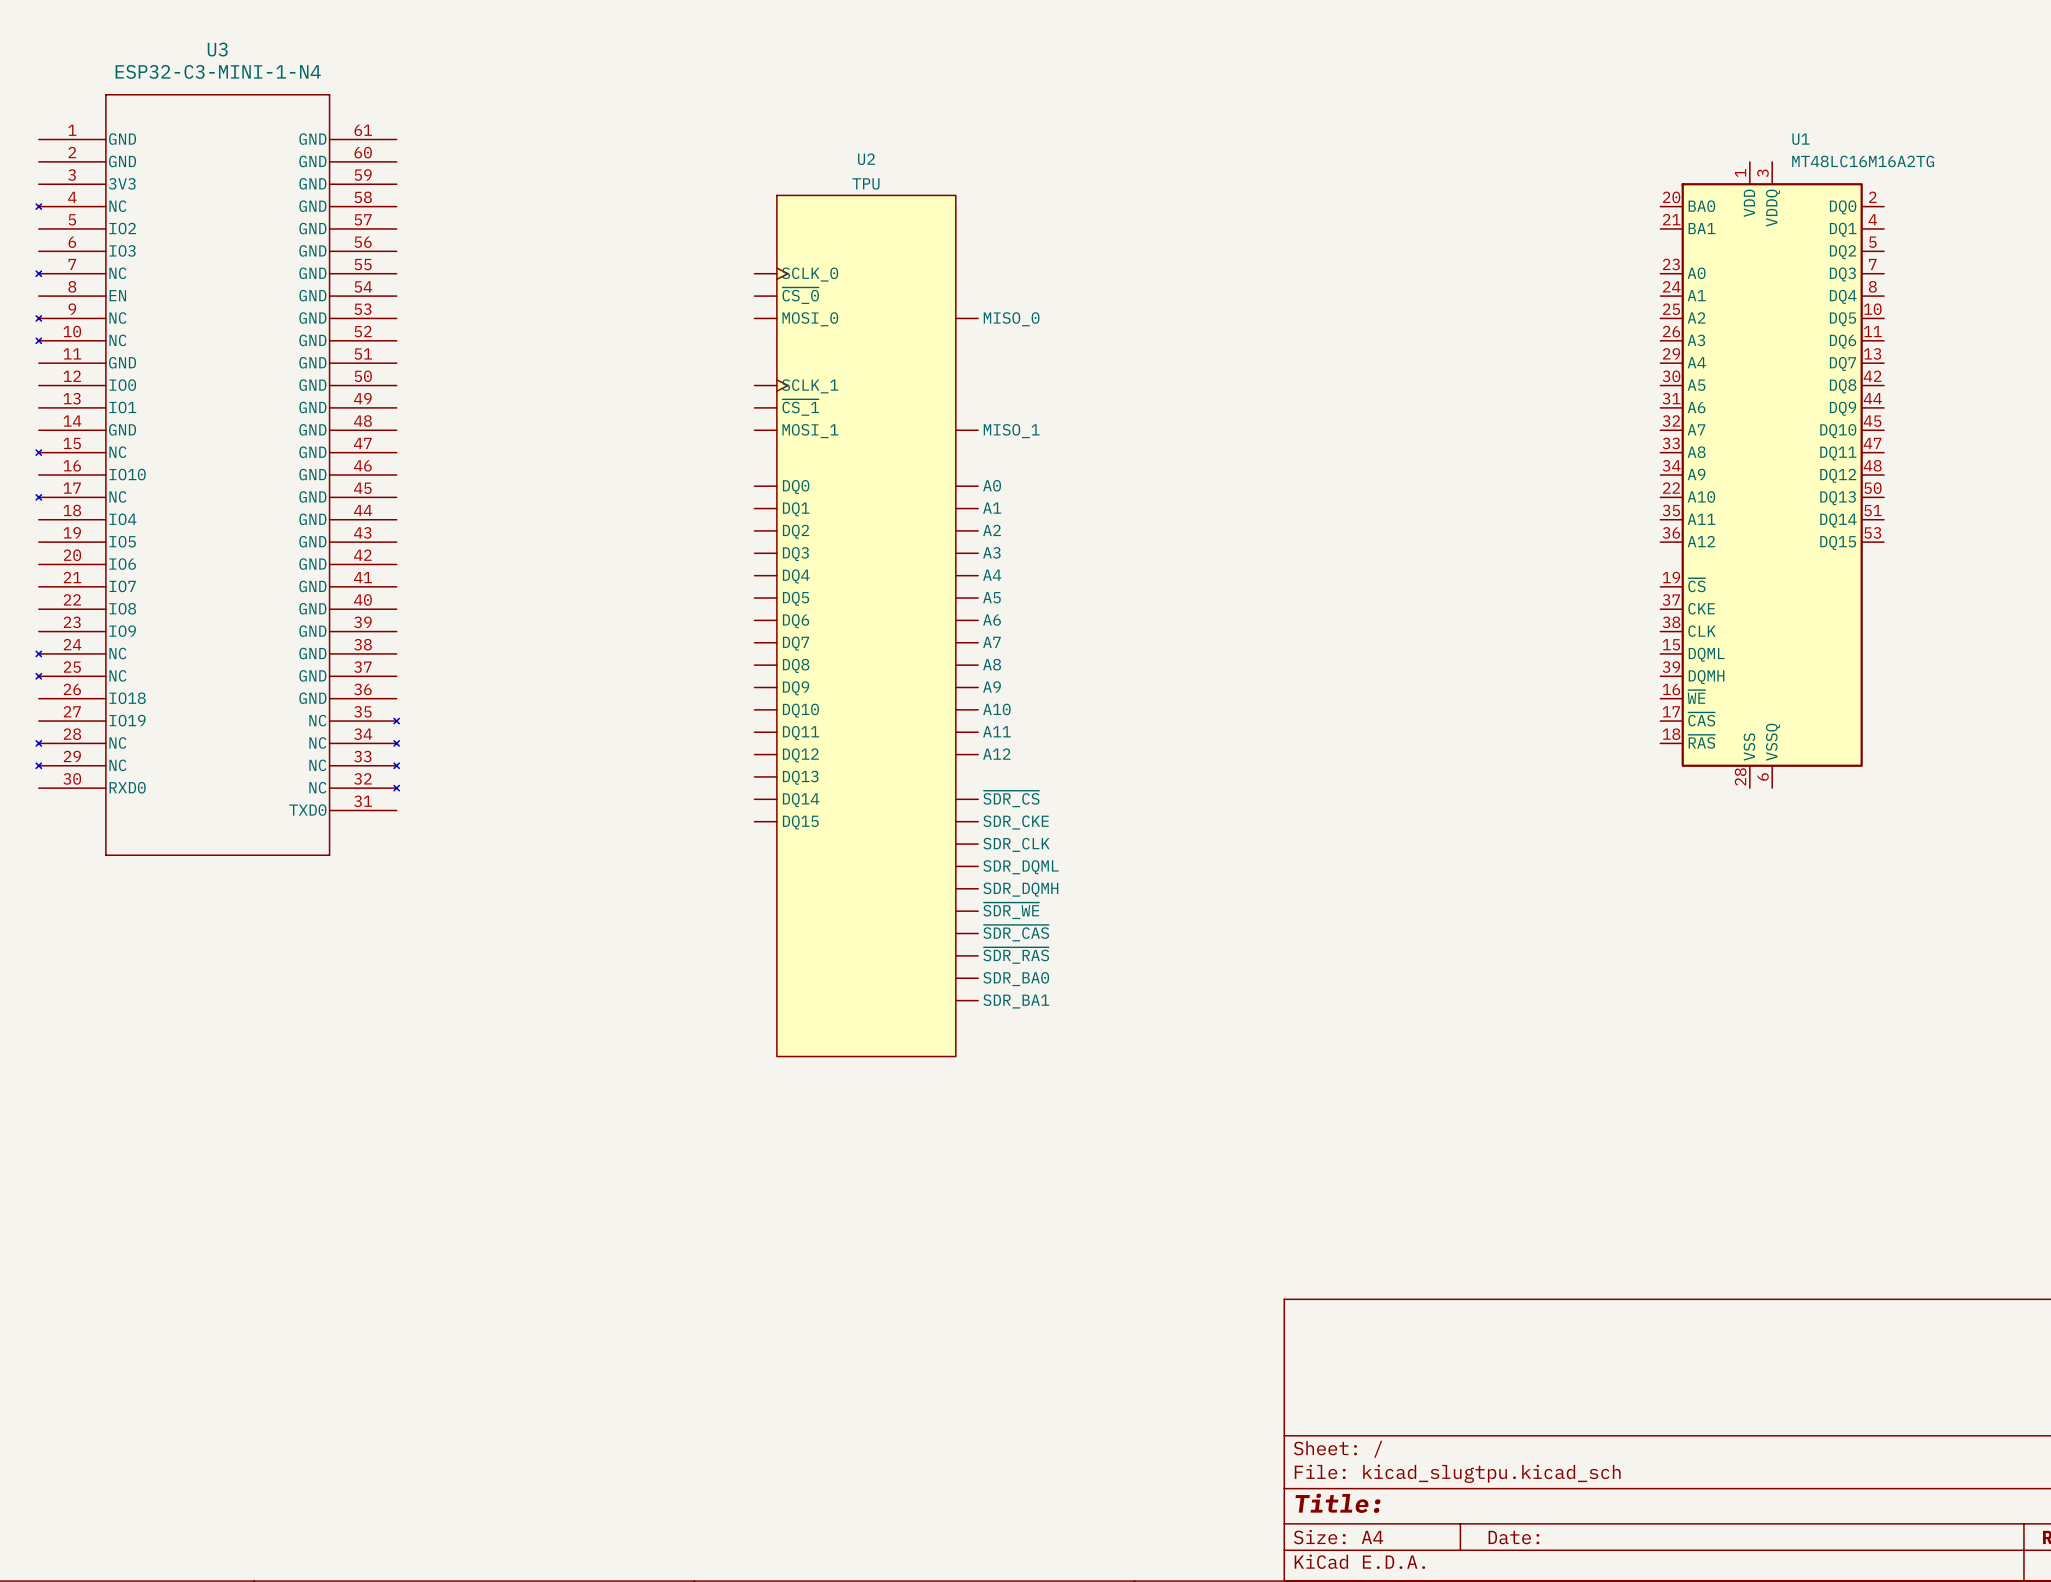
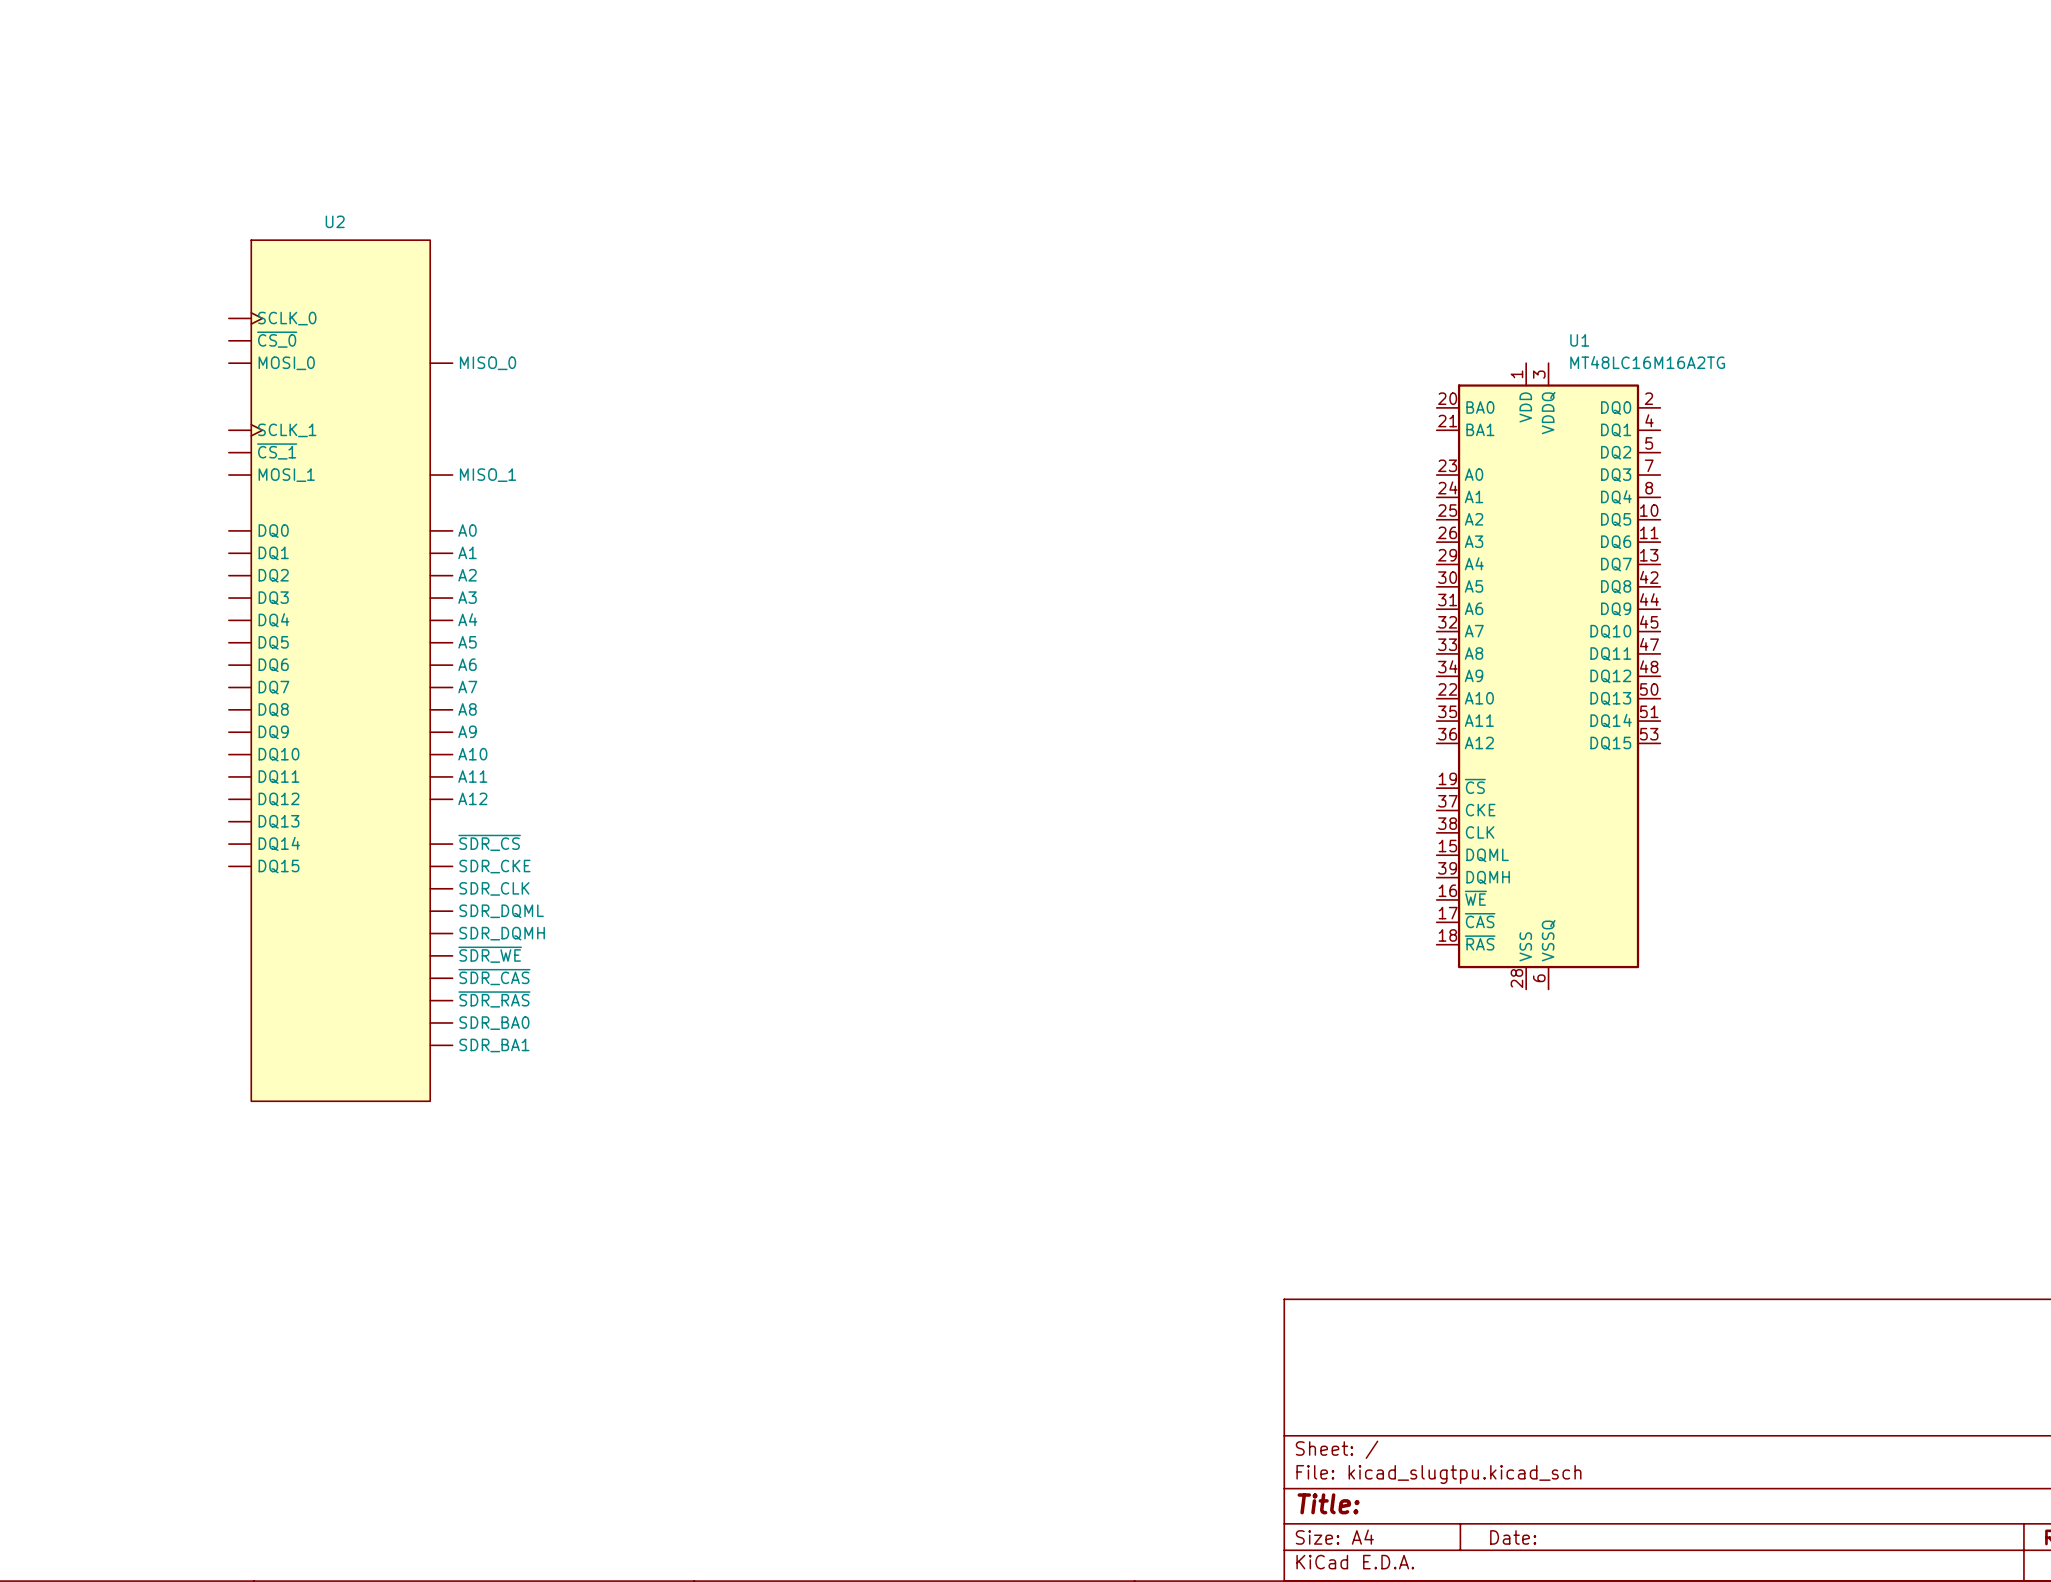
U2 name position: U2 (866, 159) -> U2 (335, 221)
U2 value: TPU (865, 183) -> none
U3: ESP32-C3-MINI-1-N4 (217, 475) -> none
U1 position: (1772, 475) -> (1548, 676)
U2 position: (866, 625) -> (340, 670)

